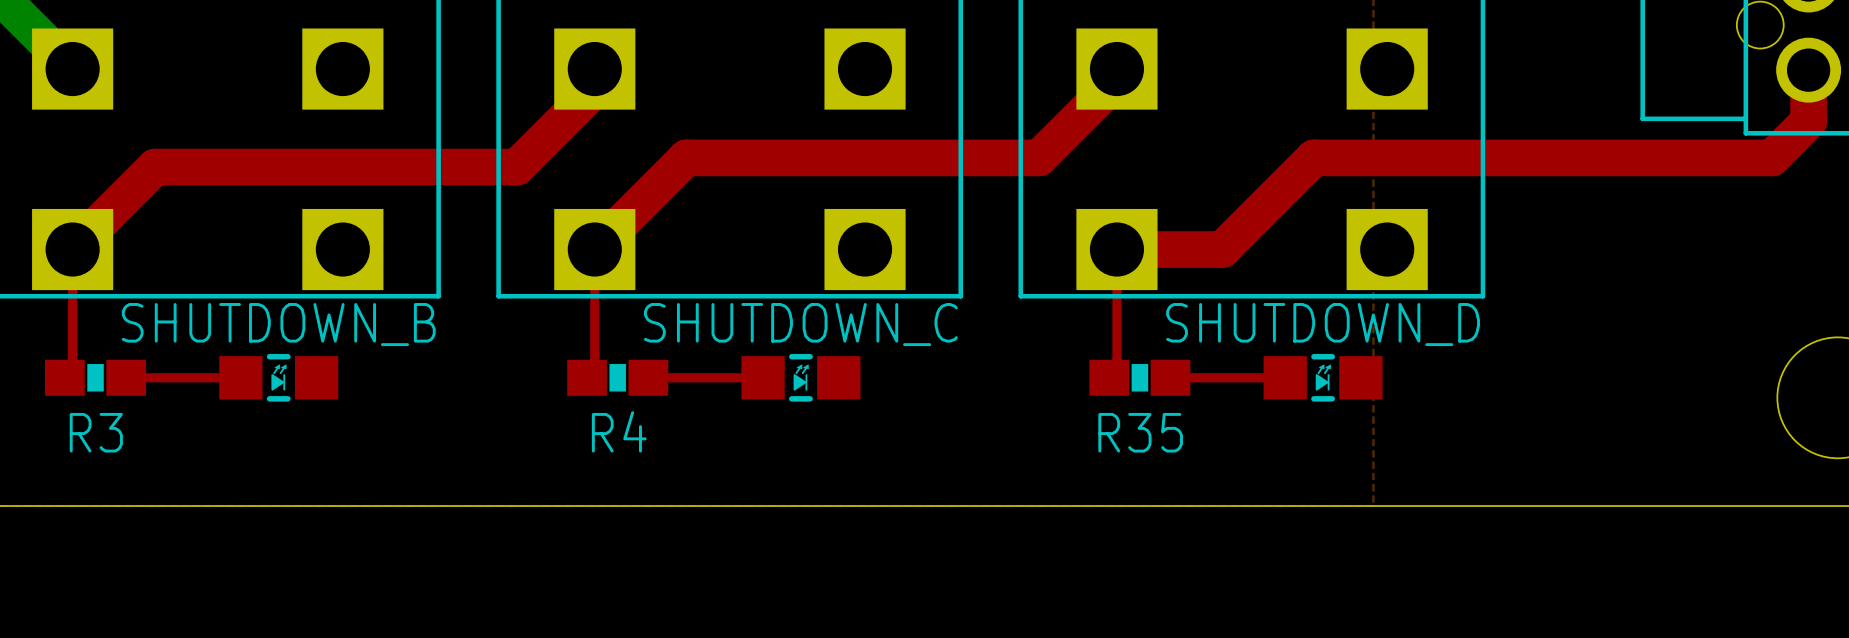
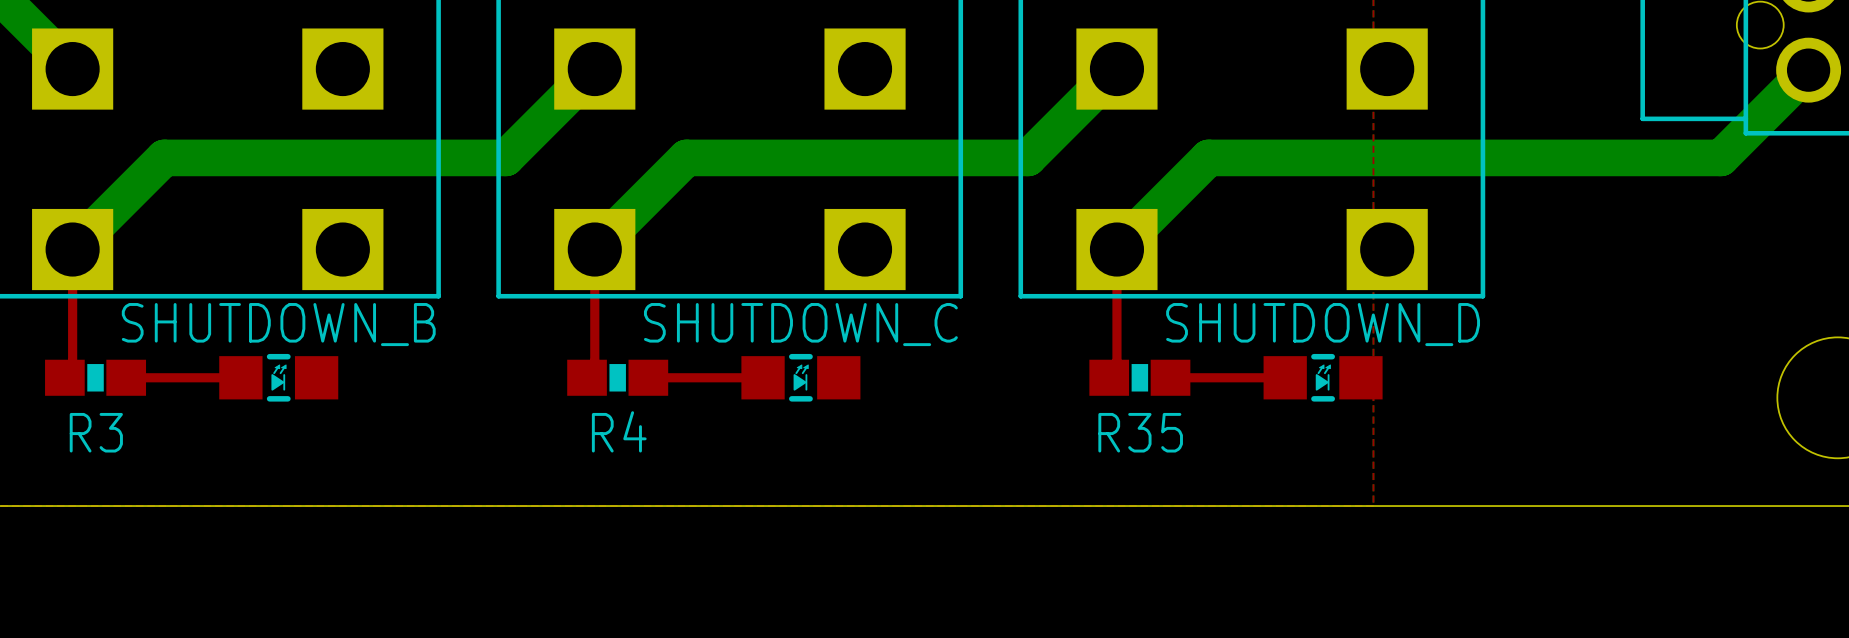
top track: (594, 69) (594, 89) (516, 167) (155, 167) (72, 249) -> none
bottom track: none -> (594, 69) (505, 157) (164, 157) (72, 249)
top track: (1116, 69) (1116, 80) (1039, 157) (686, 157) (594, 249) -> none
bottom track: none -> (1116, 69) (1028, 157) (686, 157) (594, 249)
top track: (1808, 70) (1808, 121) (1771, 157) (1313, 157) (1222, 249) (1116, 249) -> none
bottom track: none -> (1808, 70) (1720, 157) (1208, 157) (1116, 249)

